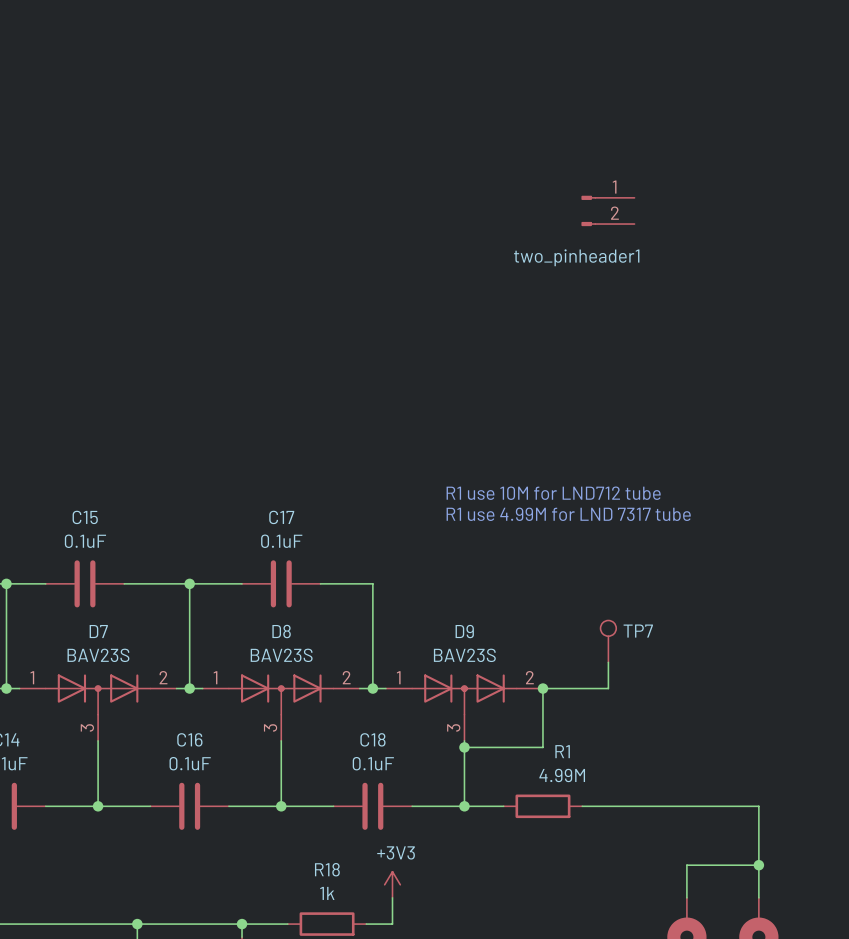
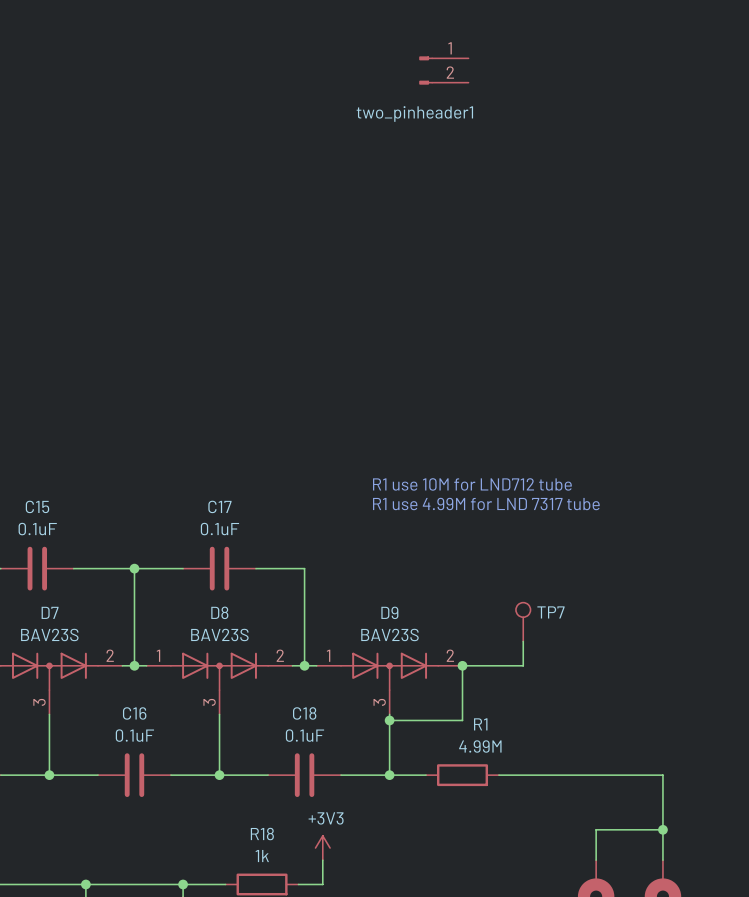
two_pinheader1 position: (608, 210) -> (443, 70)

